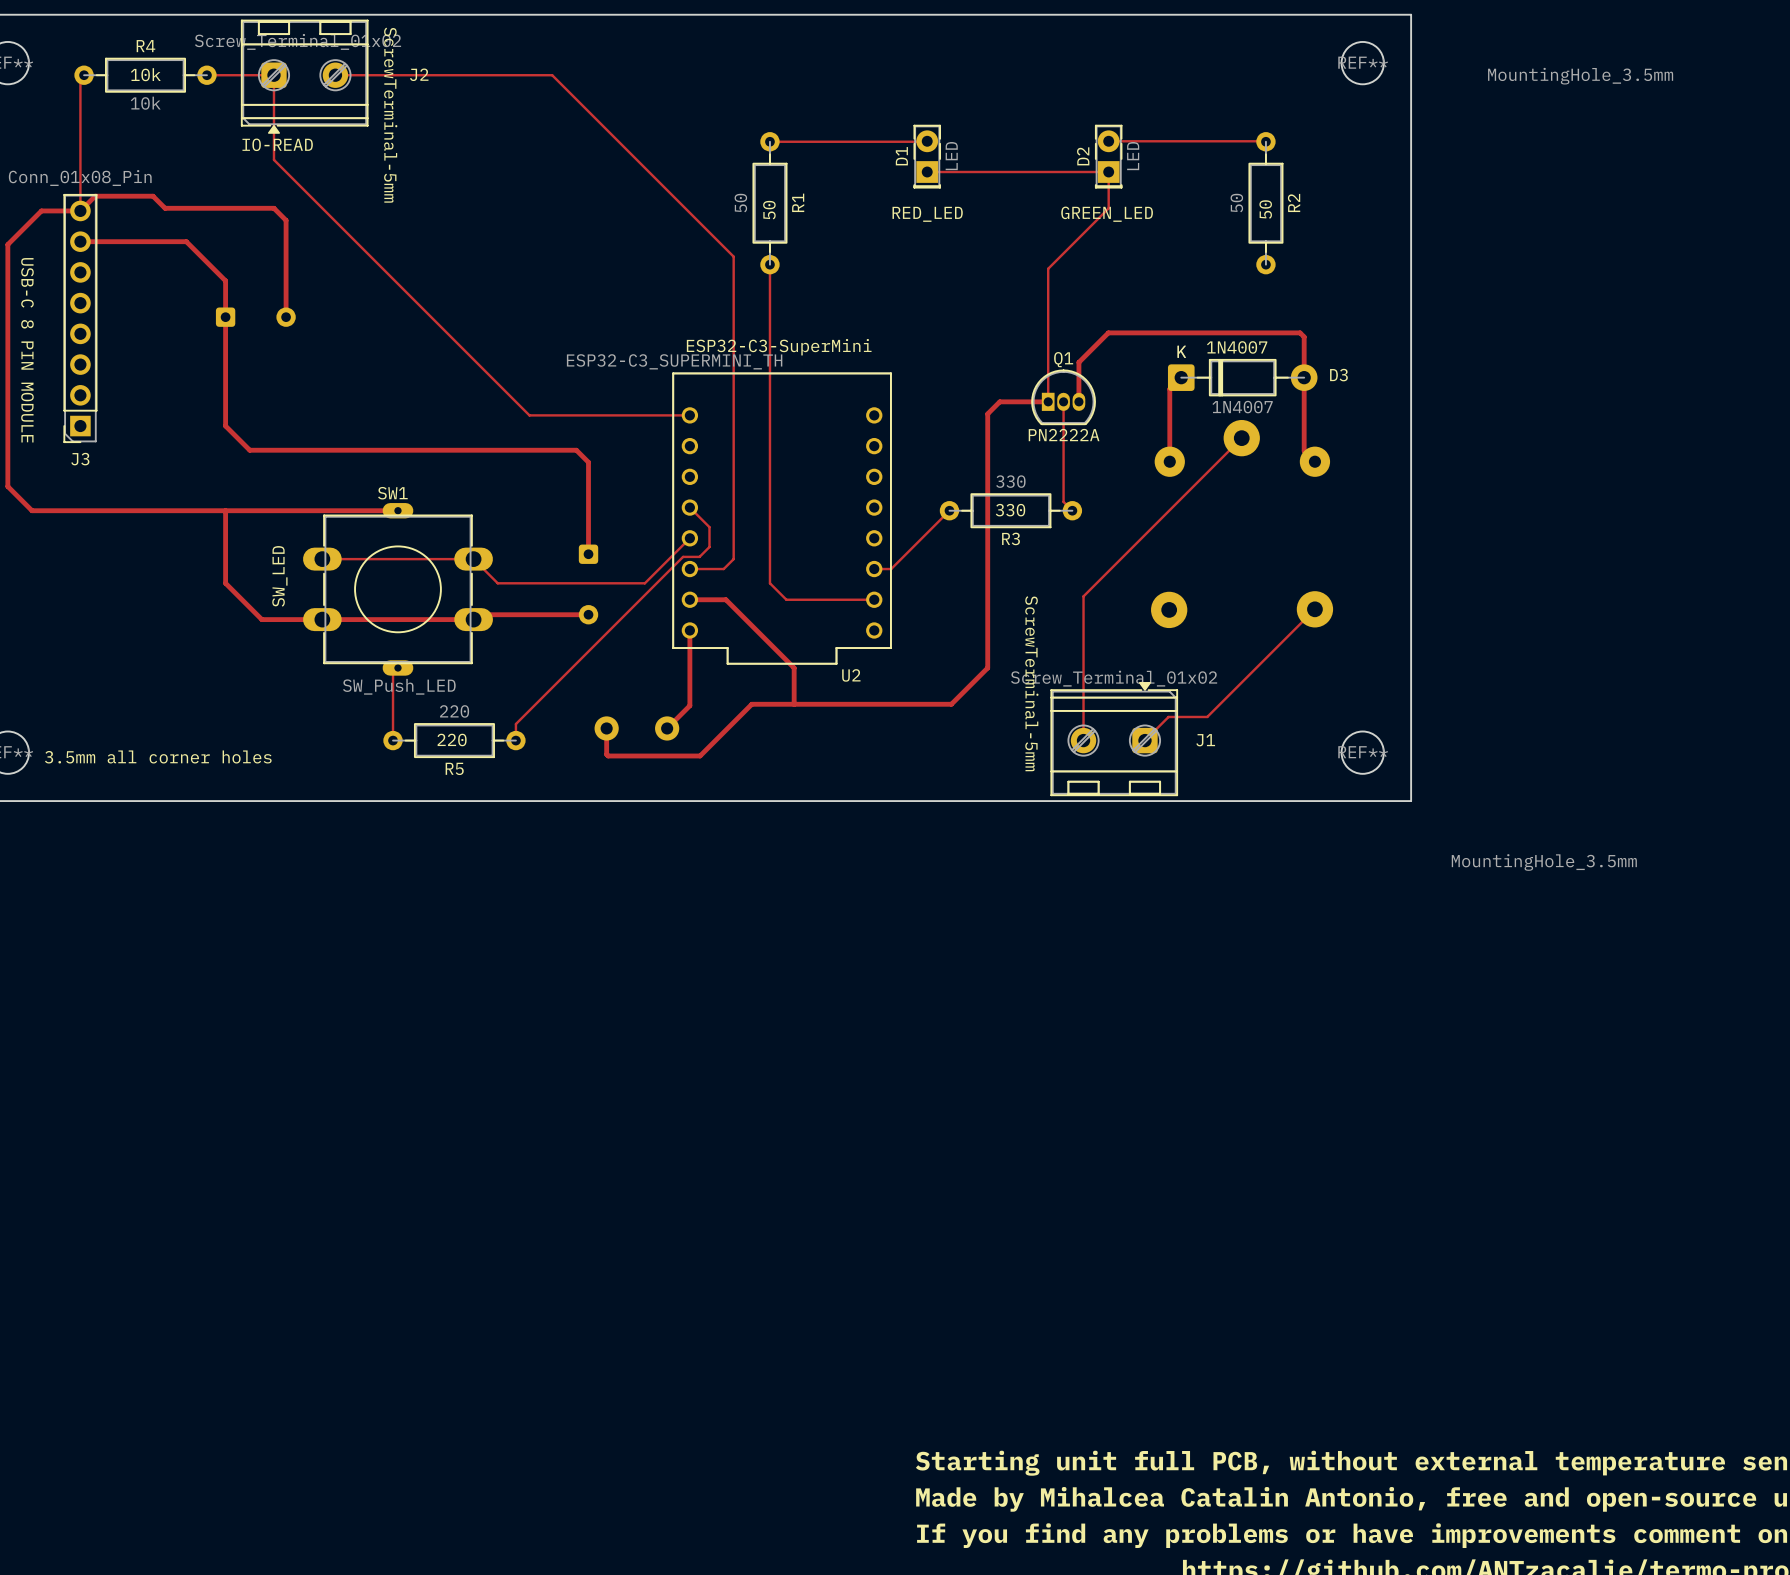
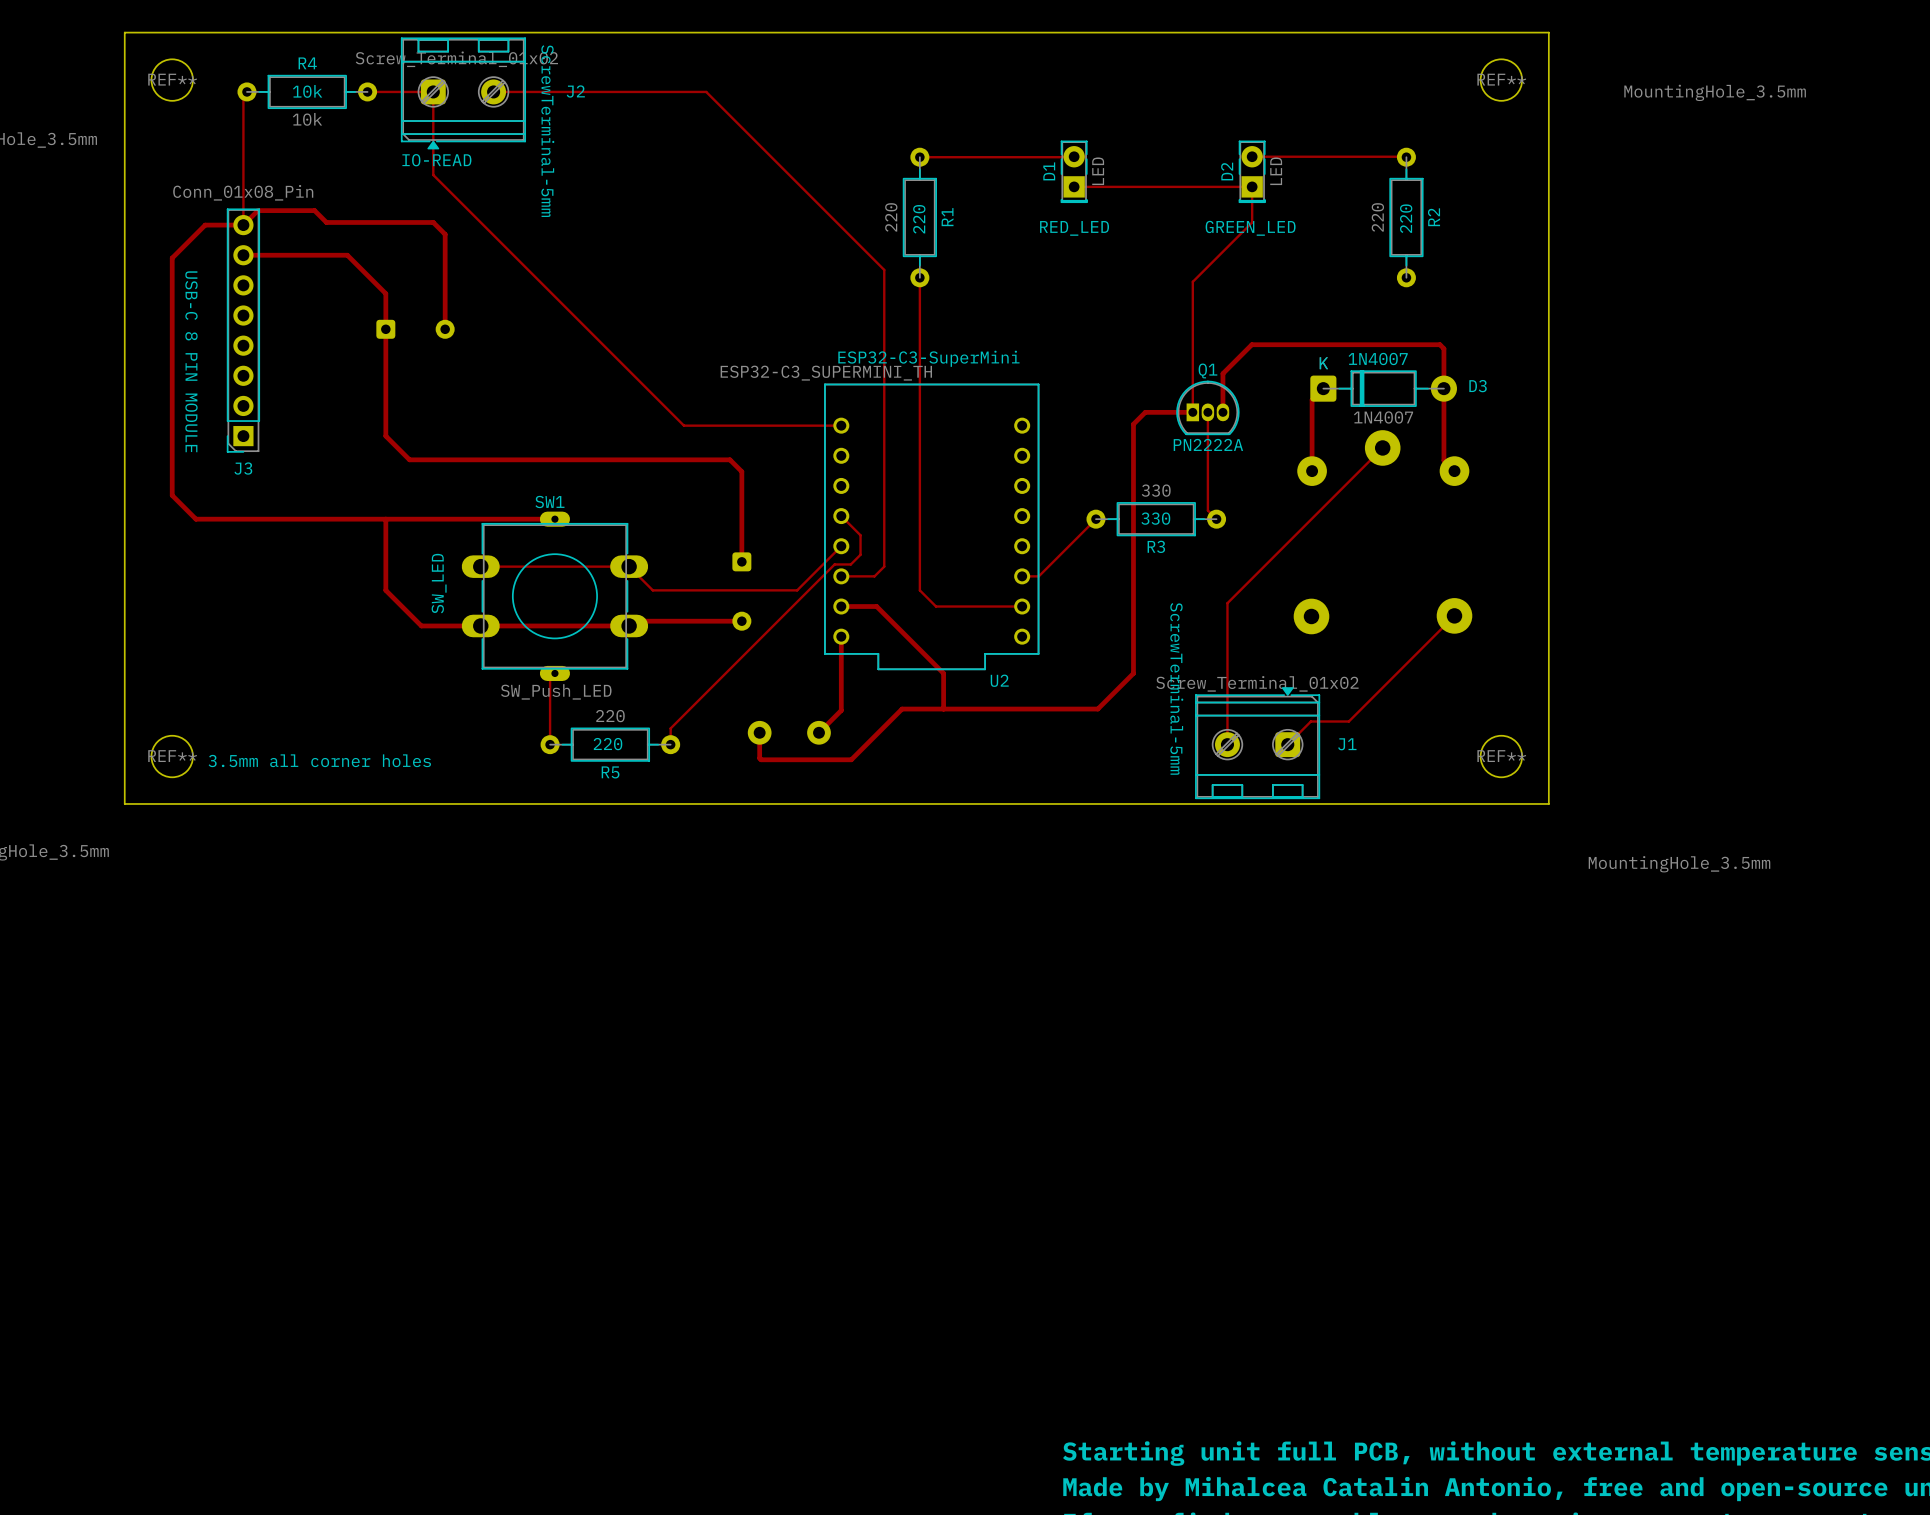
R1 value: 50 (740, 203) -> 220 (891, 217)
R2 value: 50 (1236, 203) -> 220 (1377, 217)
text: 50 (1265, 209) -> 220 (1406, 218)
text: 50 (769, 210) -> 220 (919, 219)

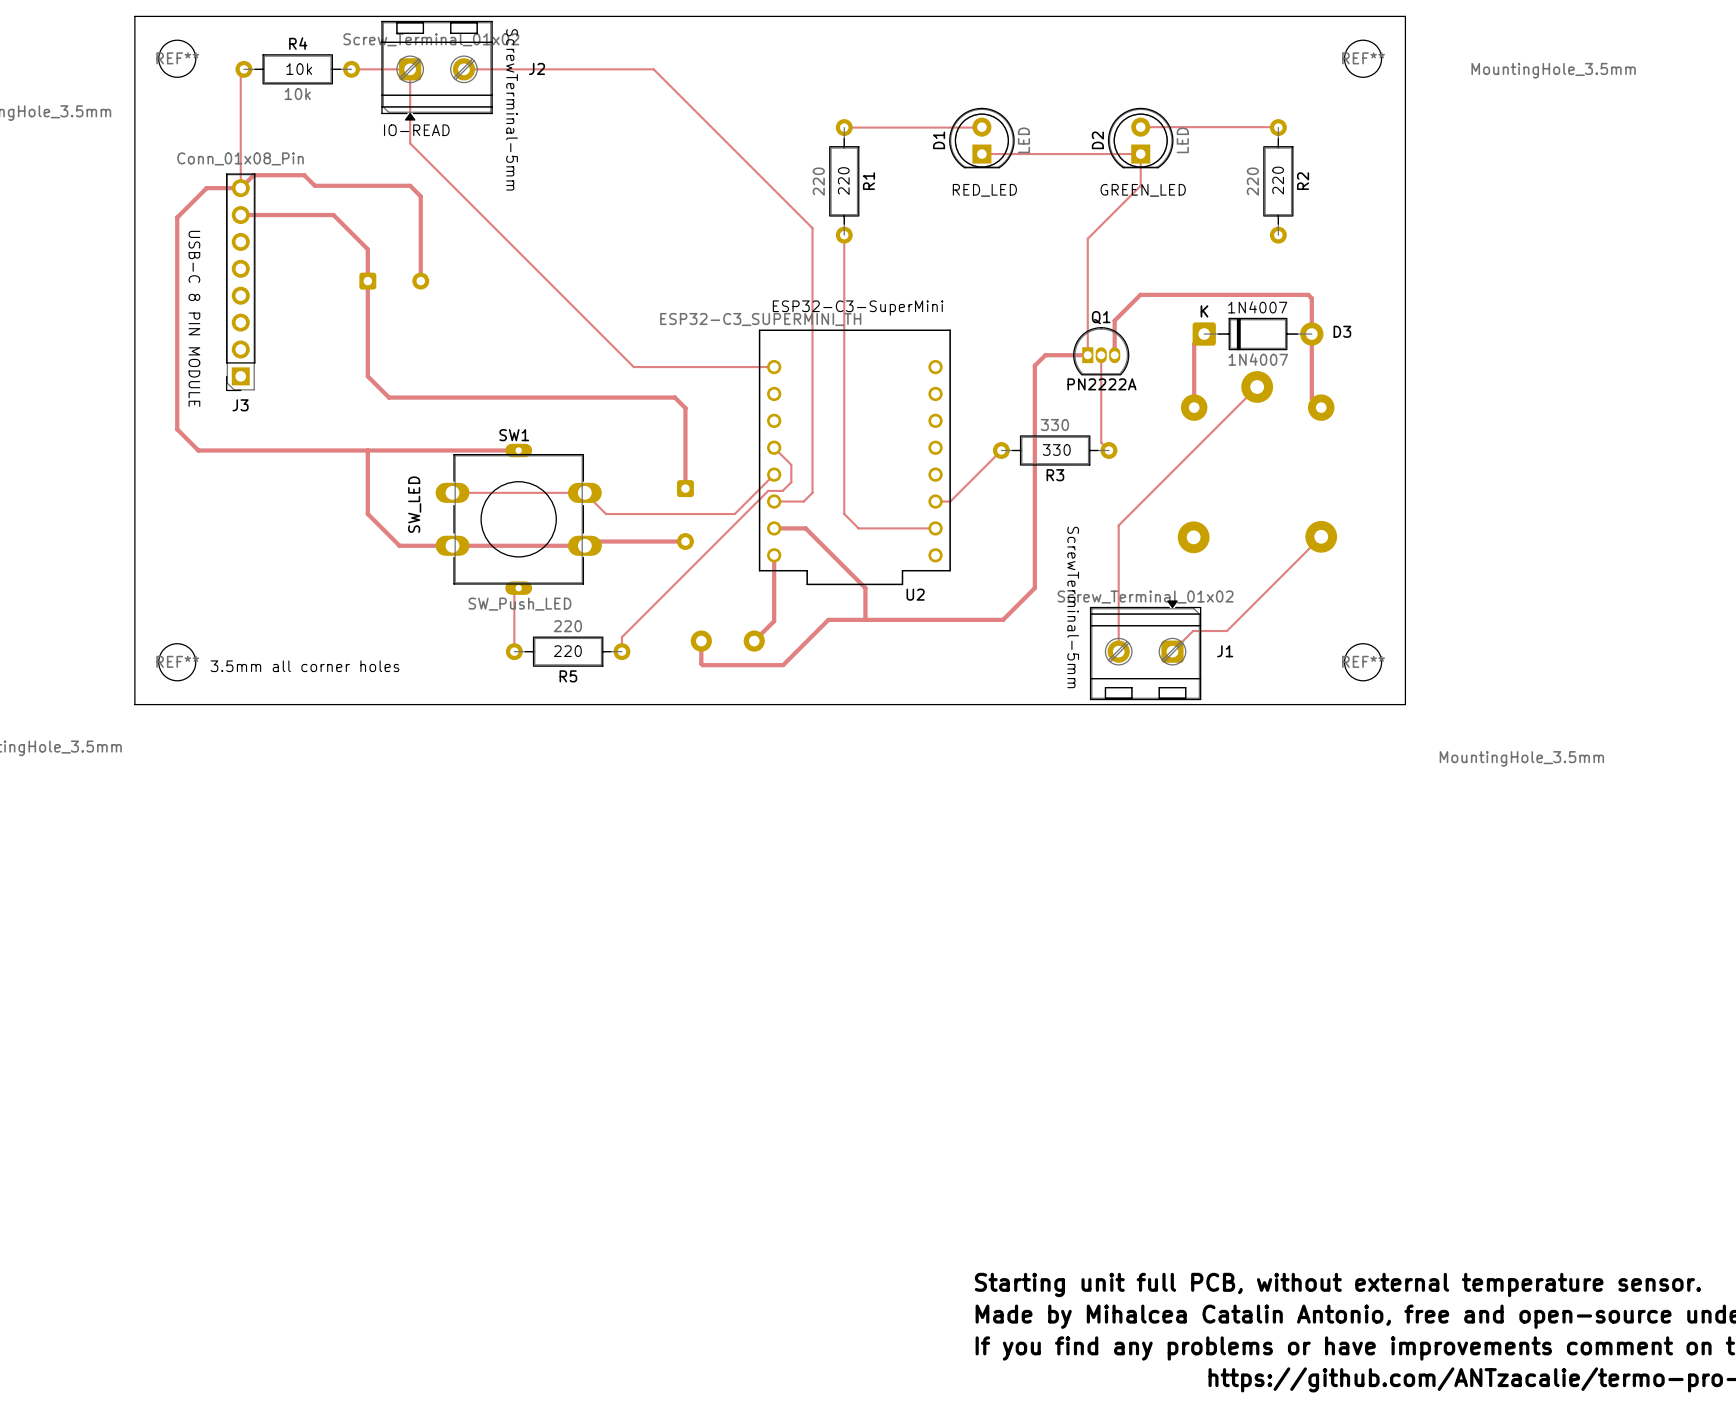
D1 footprint: [1060, 140, 1088, 203] -> [949, 107, 1015, 169]
D2 footprint: [1238, 140, 1266, 203] -> [1107, 107, 1174, 169]

